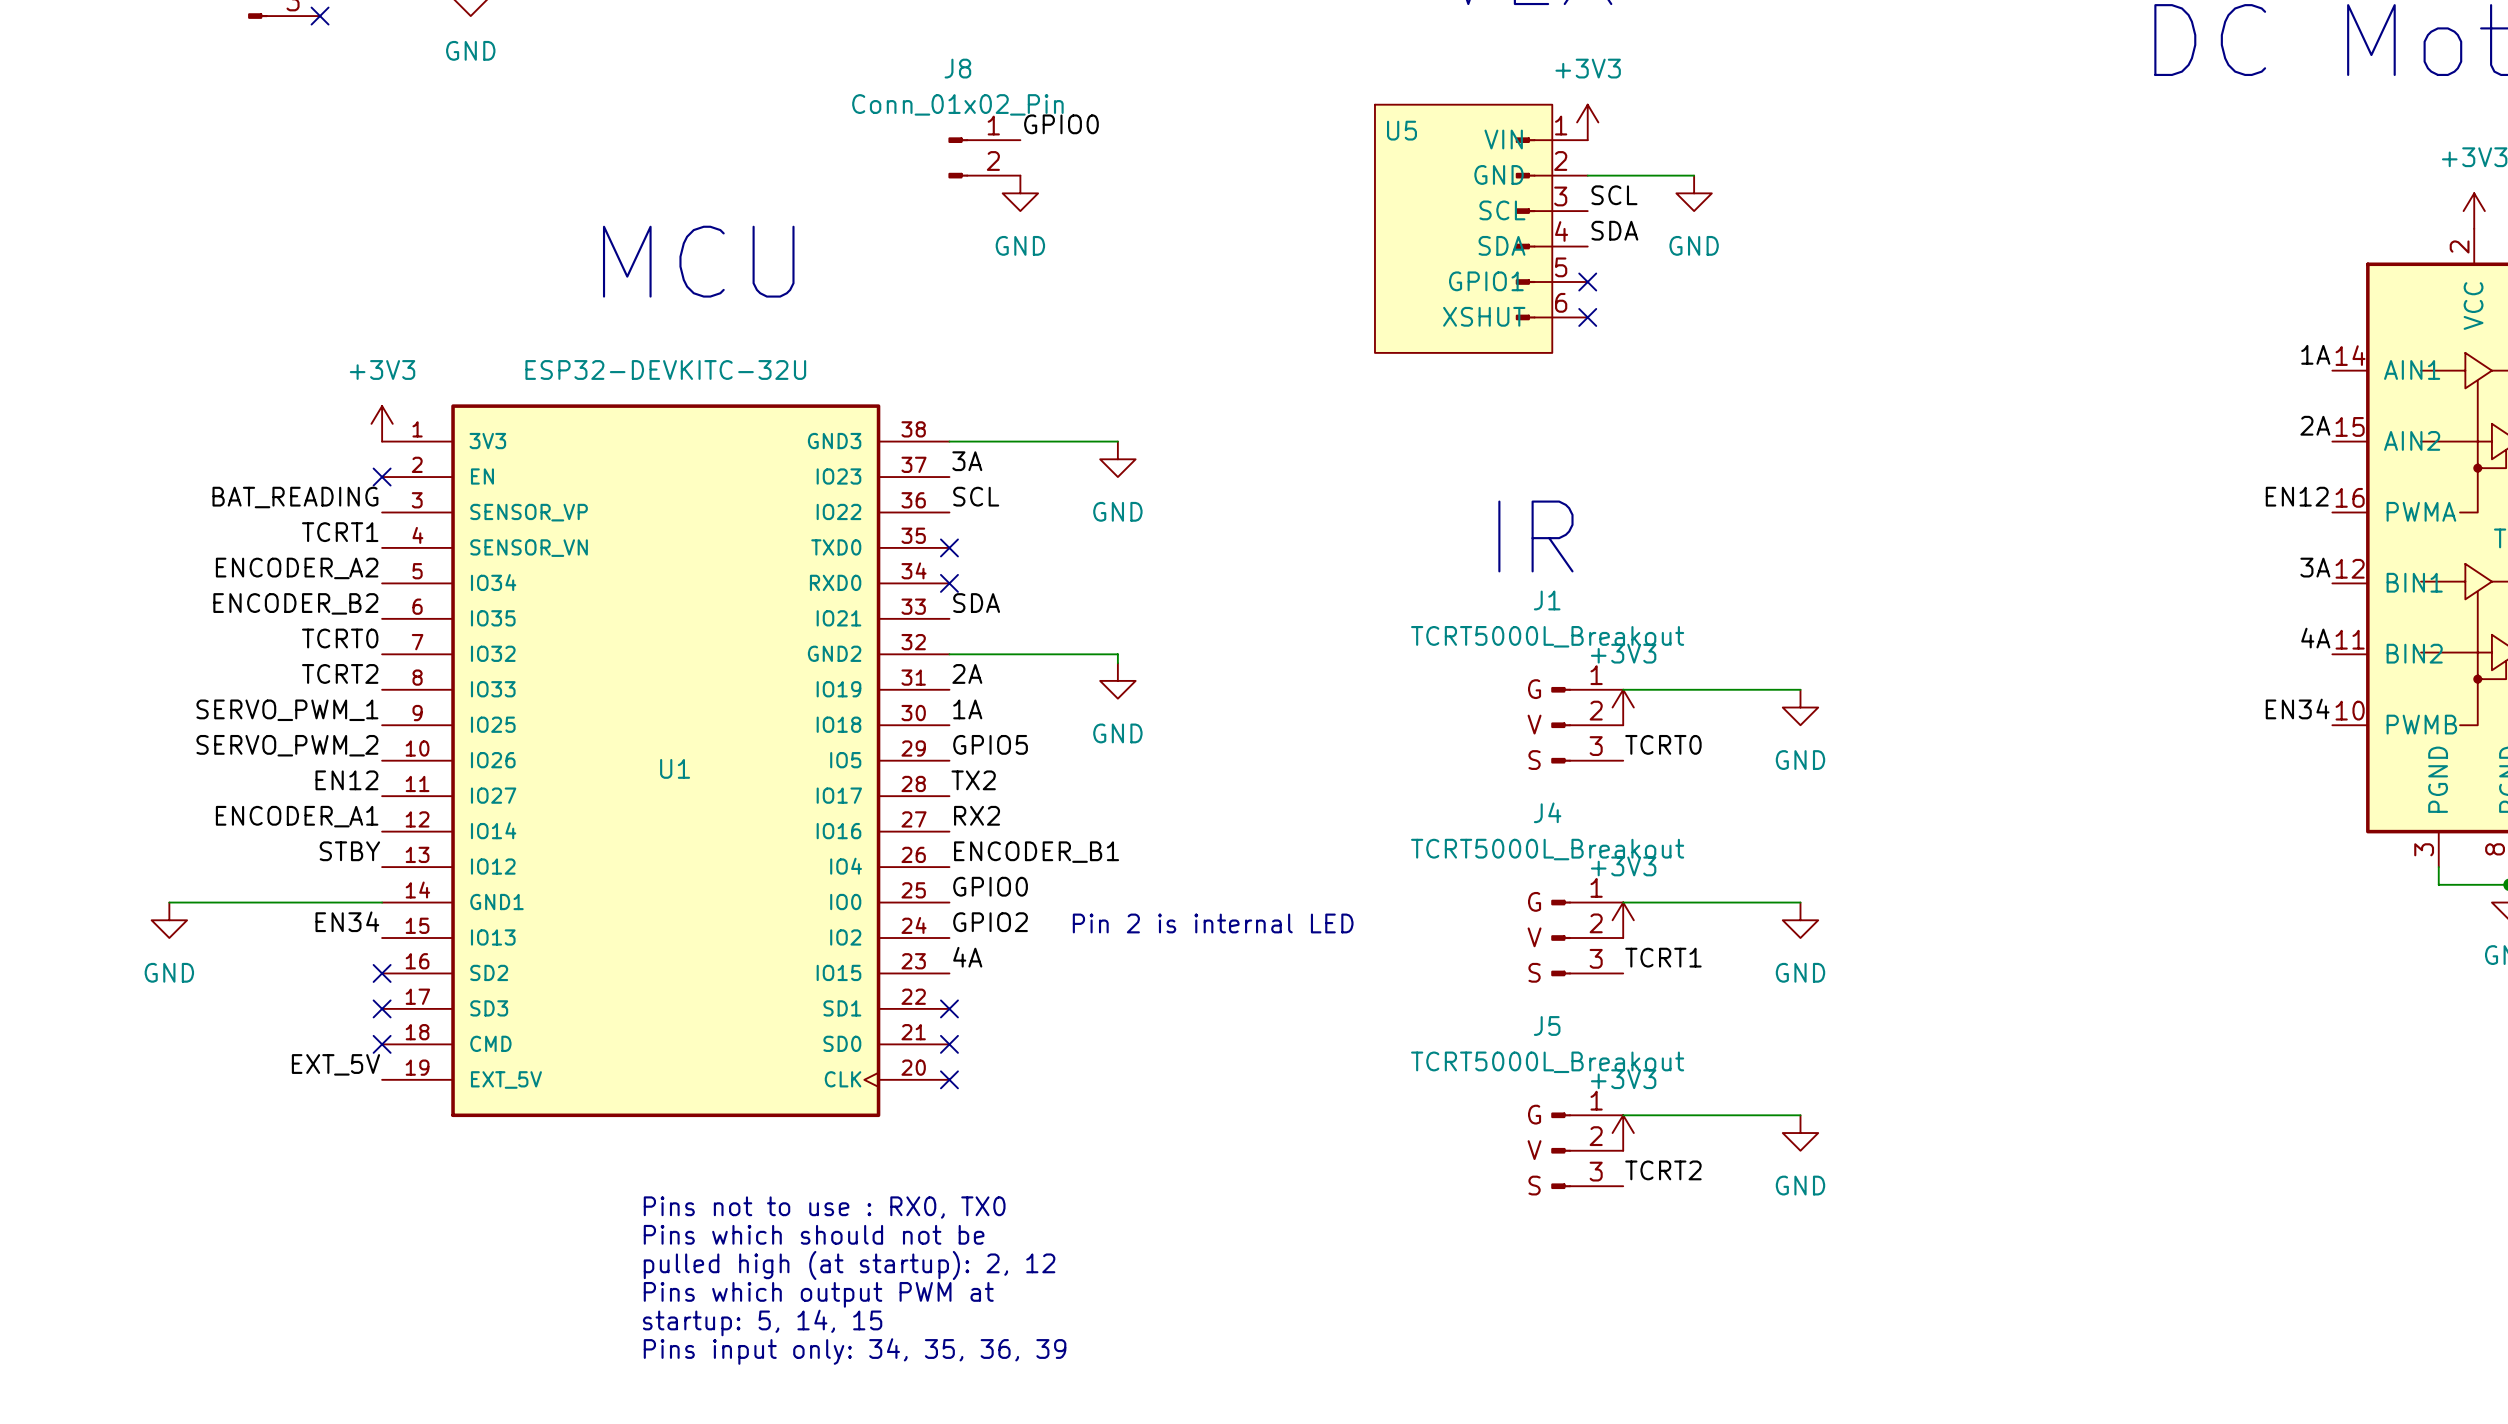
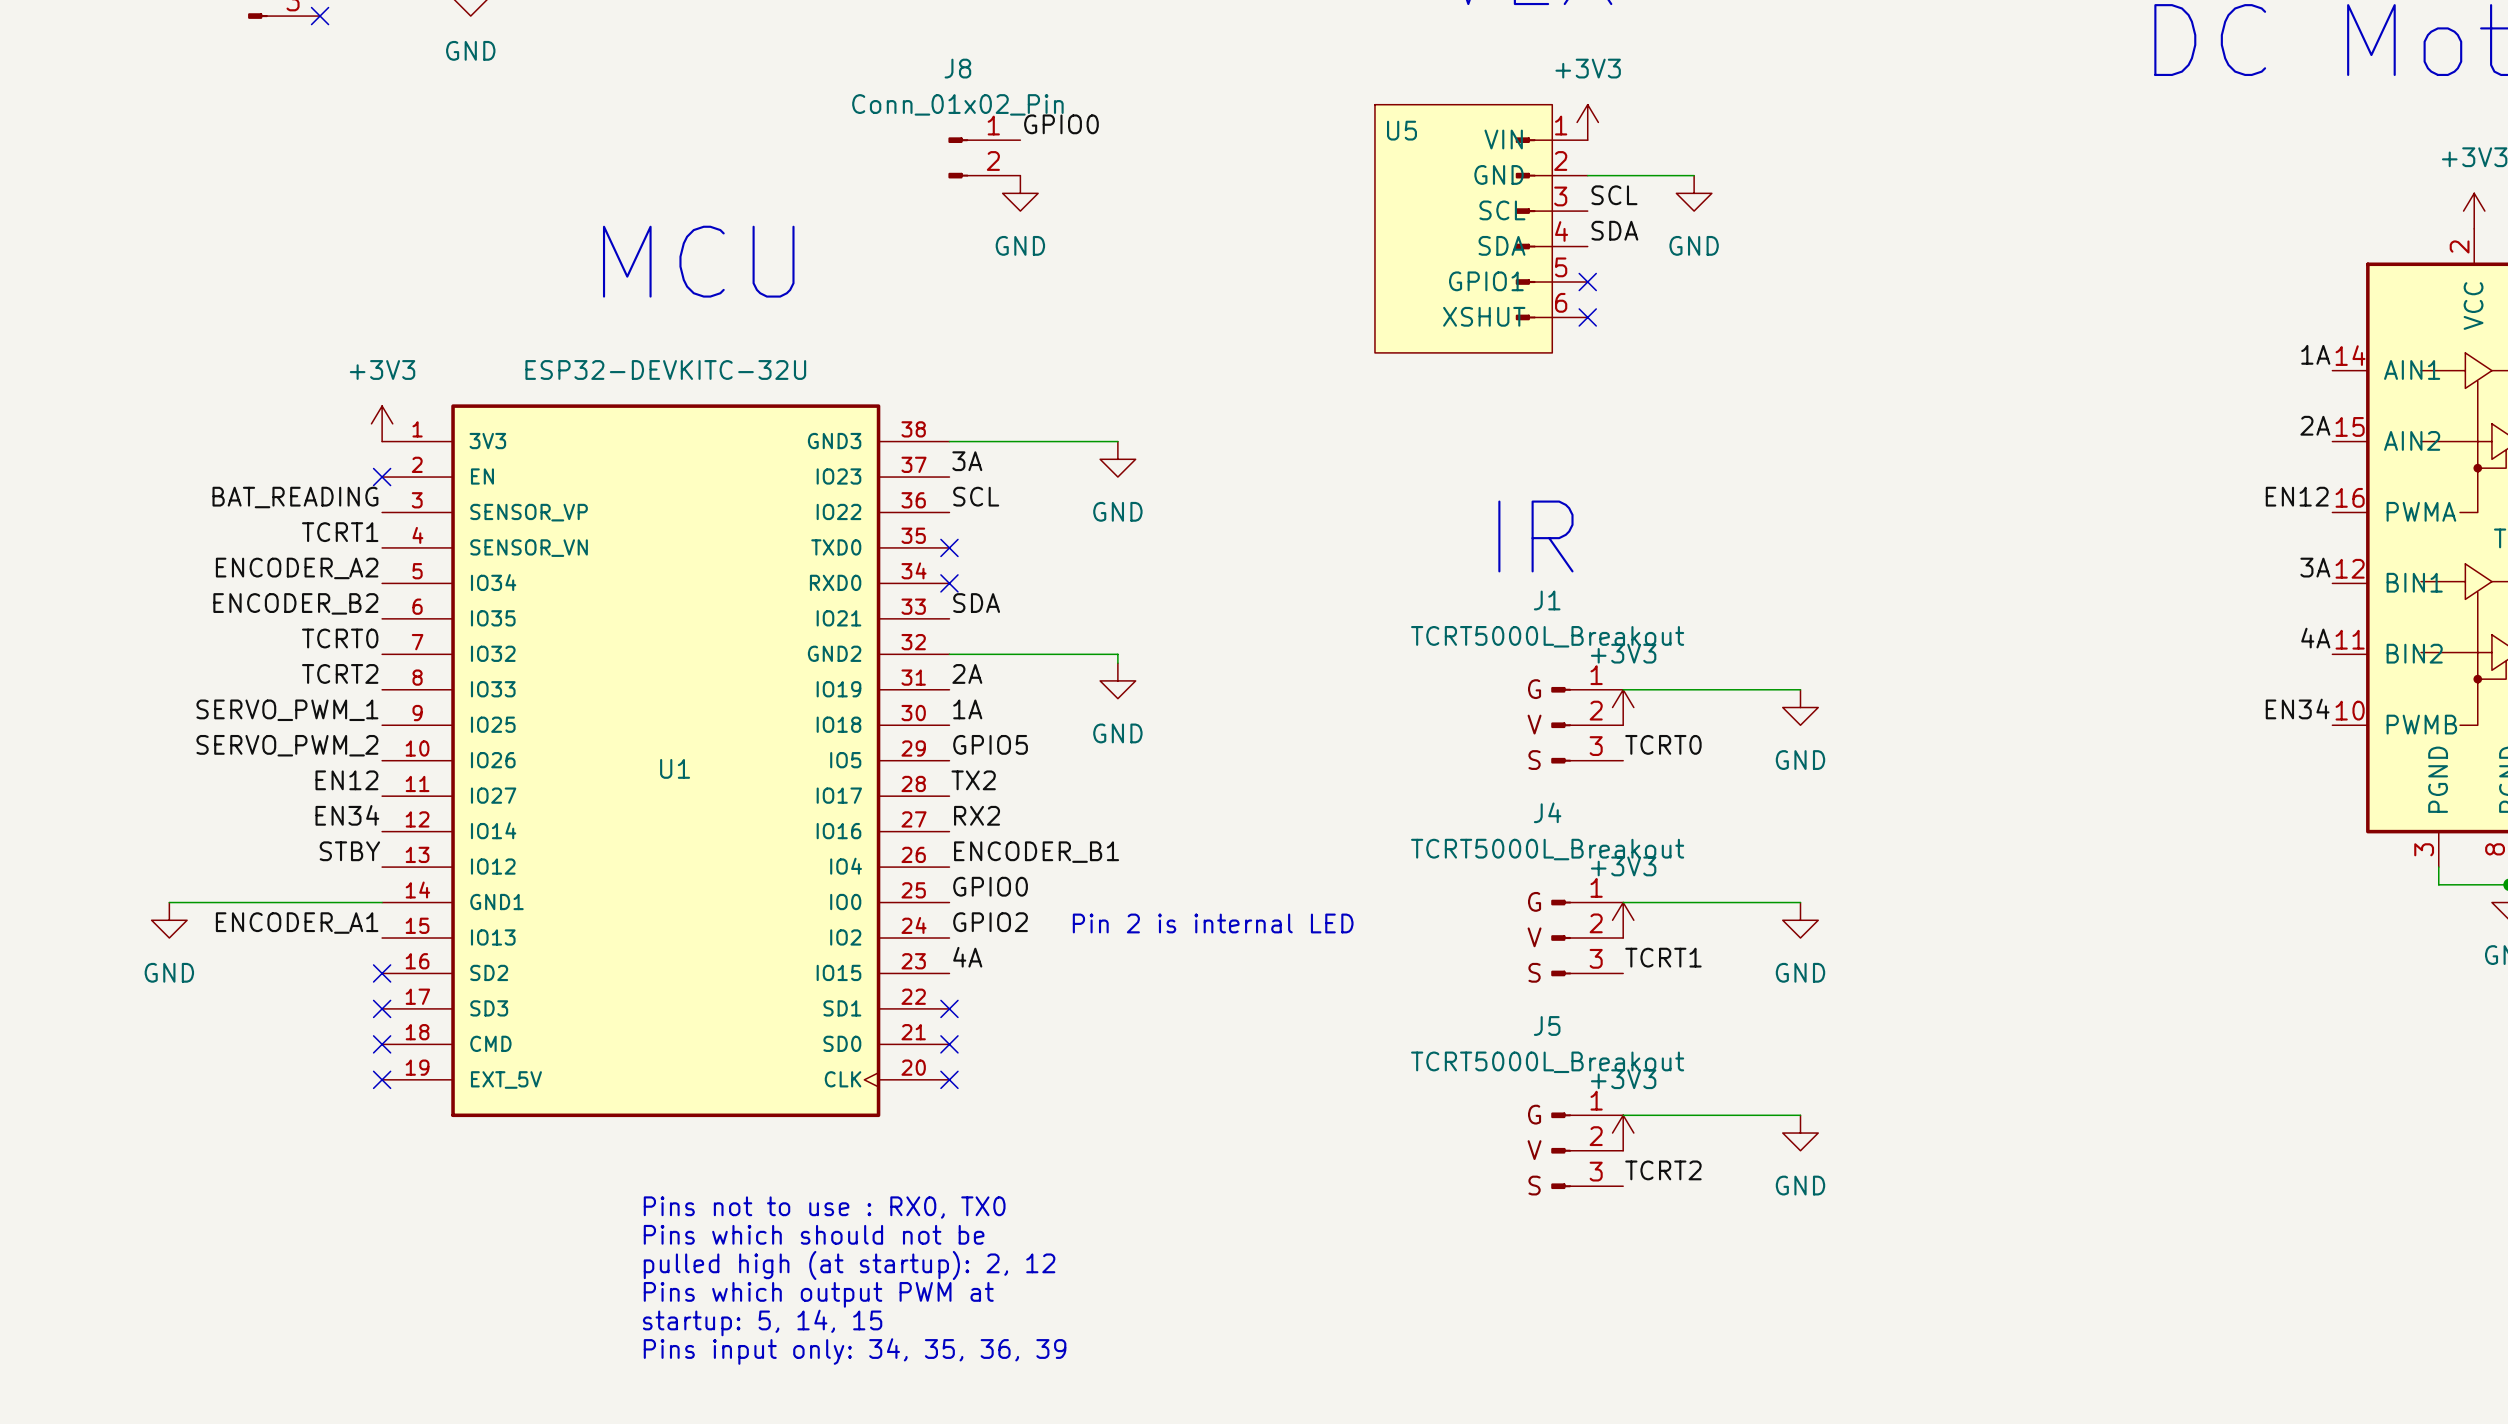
label: ENCODER_A1 (297, 816) -> EN34 (347, 815)
label: EN34 (347, 921) -> ENCODER_A1 (297, 923)
label: EXT_5V (335, 1064) -> none
no-connect mark: none -> (382, 1079)

